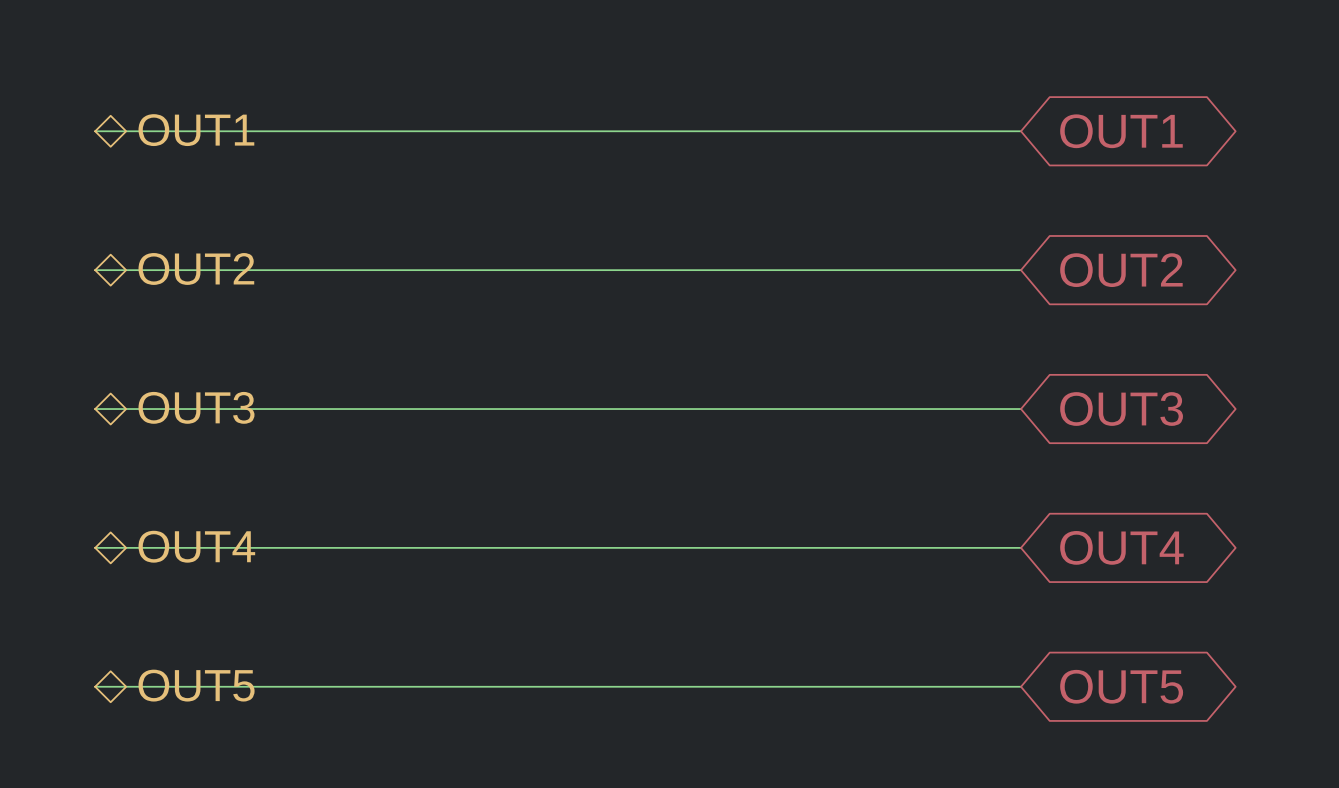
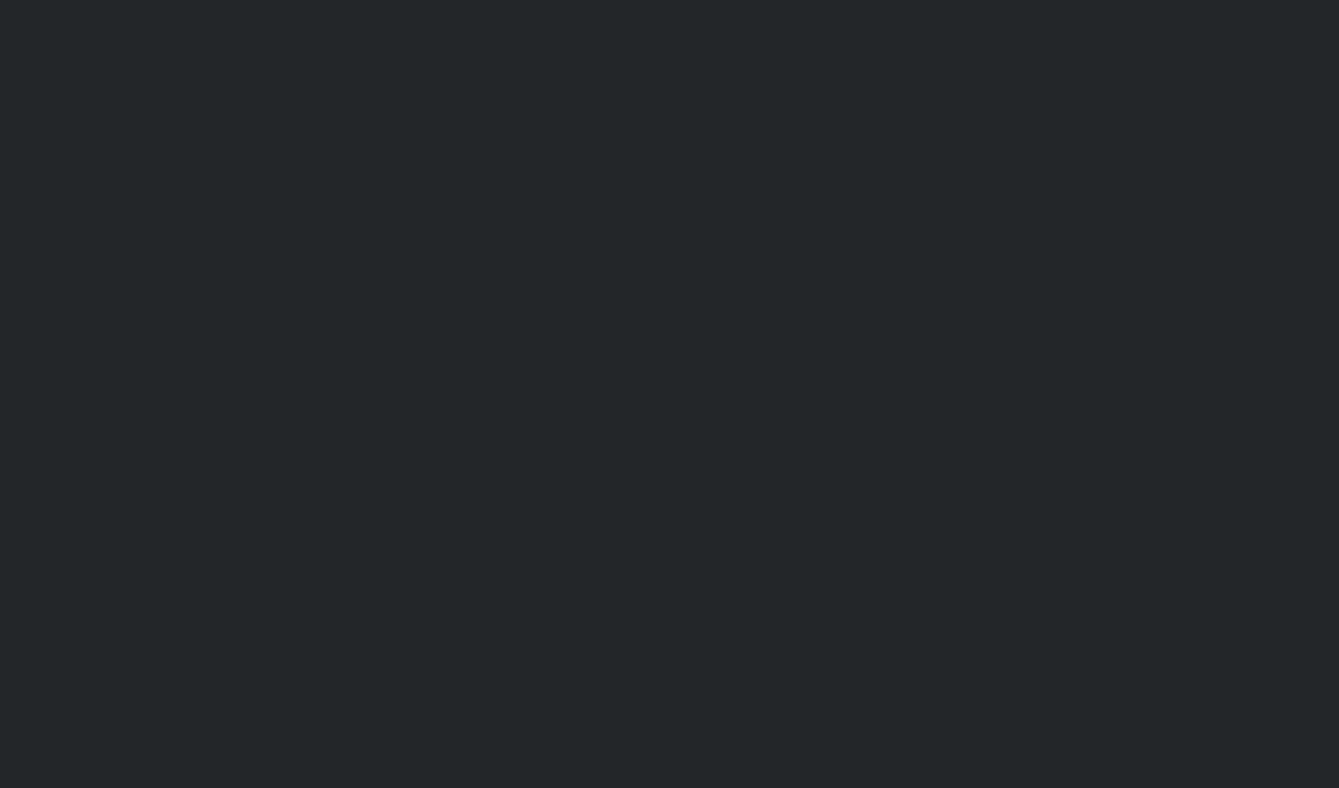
hierarchical label: OUT1 (196, 130) -> none
wire: (95, 131) (1021, 131) -> none
global label: OUT1 (1121, 131) -> none
hierarchical label: OUT2 (196, 268) -> none
wire: (95, 270) (1021, 270) -> none
global label: OUT2 (1121, 270) -> none
hierarchical label: OUT3 (196, 407) -> none
wire: (95, 409) (1021, 409) -> none
global label: OUT3 (1121, 409) -> none
hierarchical label: OUT4 (196, 546) -> none
wire: (95, 547) (1021, 547) -> none
global label: OUT4 (1121, 547) -> none
hierarchical label: OUT5 (196, 685) -> none
wire: (95, 686) (1021, 686) -> none
global label: OUT5 (1121, 686) -> none

